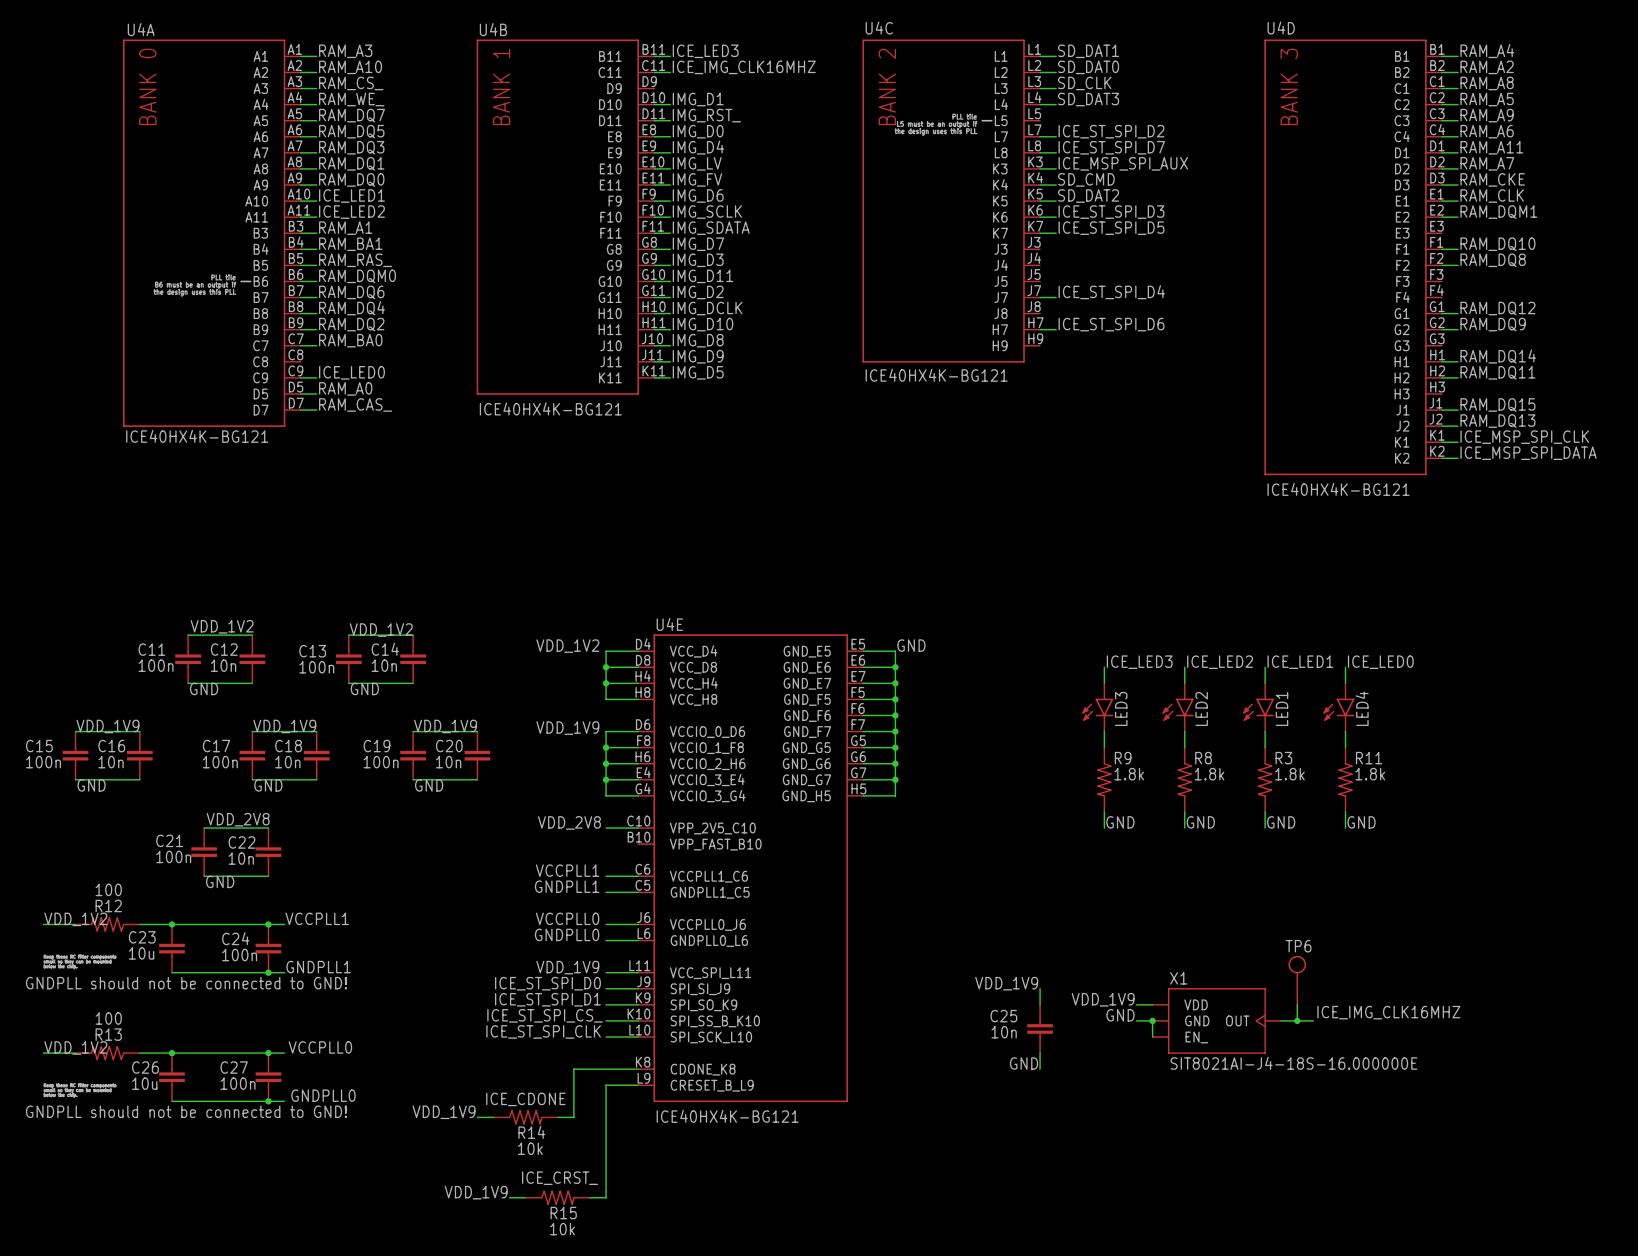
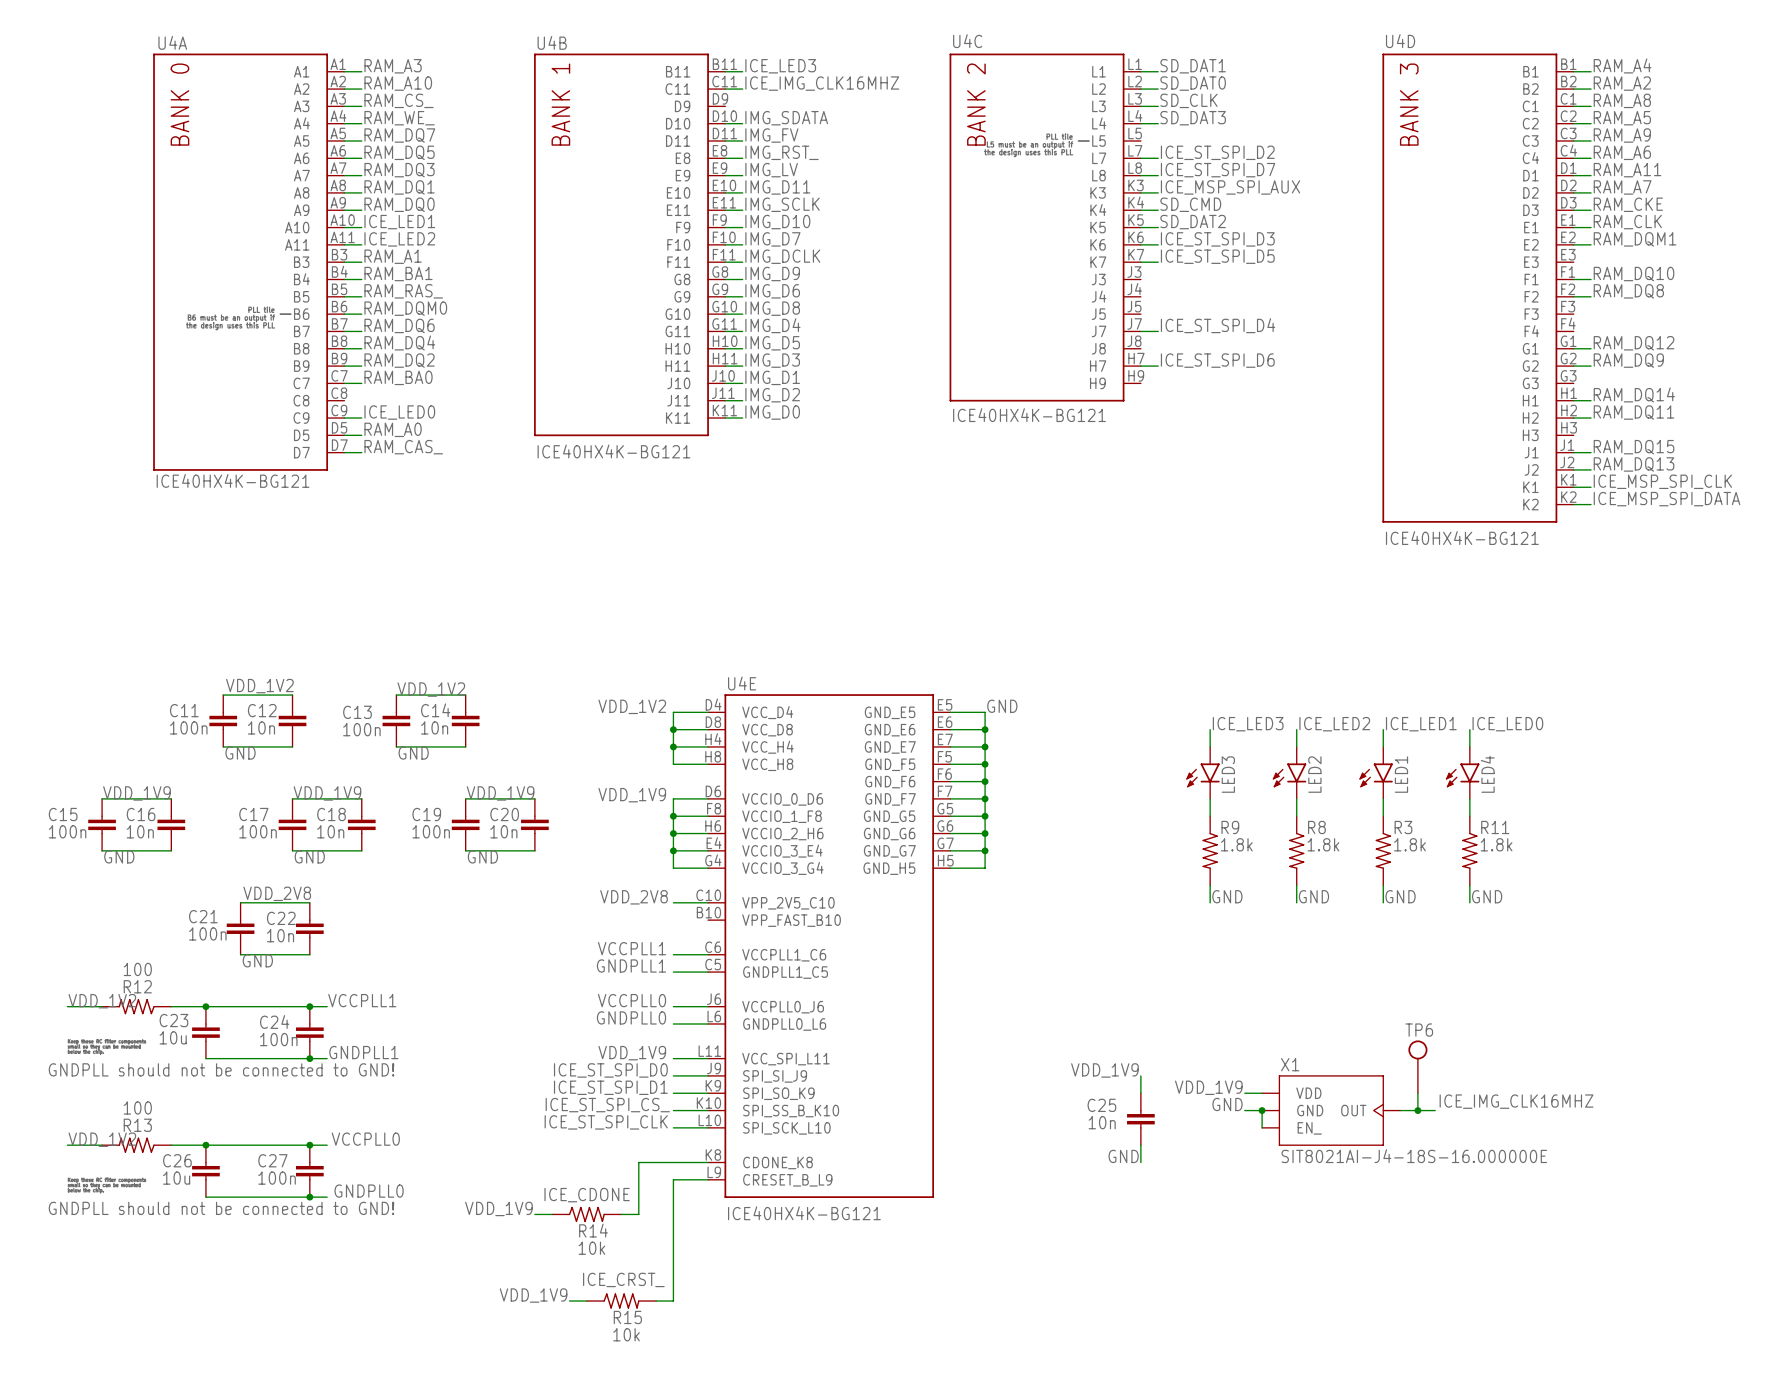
label: IMG_D1 (698, 99) -> IMG_SDATA (786, 118)
label: IMG_RST_ (706, 115) -> IMG_FV (771, 135)
label: IMG_D0 (698, 131) -> IMG_RST_ (782, 152)
label: IMG_D4 (698, 147) -> IMG_LV (771, 170)
label: IMG_LV (697, 163) -> IMG_D11 (777, 187)
label: IMG_FV (697, 179) -> IMG_SCLK (782, 204)
label: IMG_D6 (698, 195) -> IMG_D10 (777, 222)
label: IMG_SCLK (707, 212) -> IMG_D7 (772, 239)
label: IMG_SDATA (711, 228) -> IMG_DCLK (782, 256)
label: IMG_D7 (698, 244) -> IMG_D9 (772, 274)
label: IMG_D3 (698, 260) -> IMG_D6 (772, 291)
label: IMG_D11 (703, 276) -> IMG_D8 (772, 308)
label: IMG_D2 (698, 292) -> IMG_D4 (772, 325)
label: IMG_DCLK (707, 308) -> IMG_D5 (772, 343)
label: IMG_D10 (703, 324) -> IMG_D3 (772, 360)
label: IMG_D8 (698, 340) -> IMG_D1 (772, 377)
label: IMG_D9 (698, 356) -> IMG_D2 (772, 395)
label: IMG_D5 (698, 372) -> IMG_D0 (772, 412)

